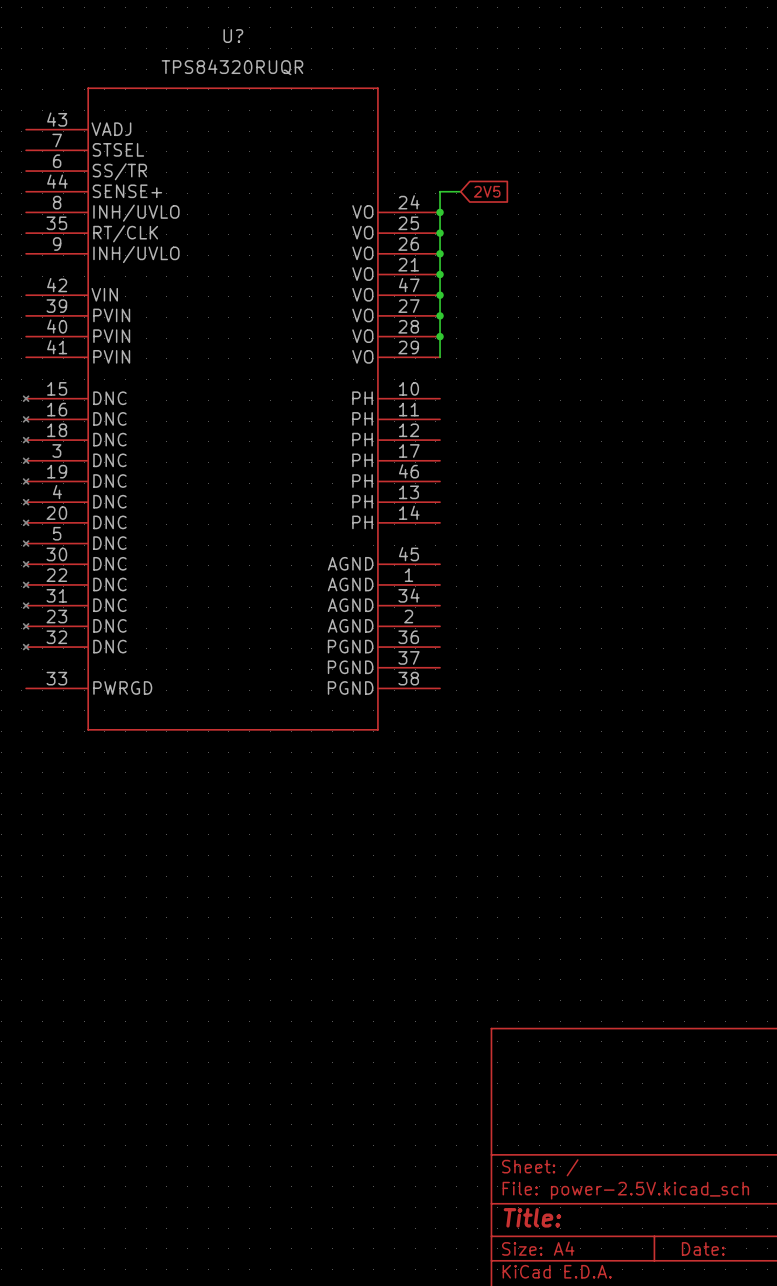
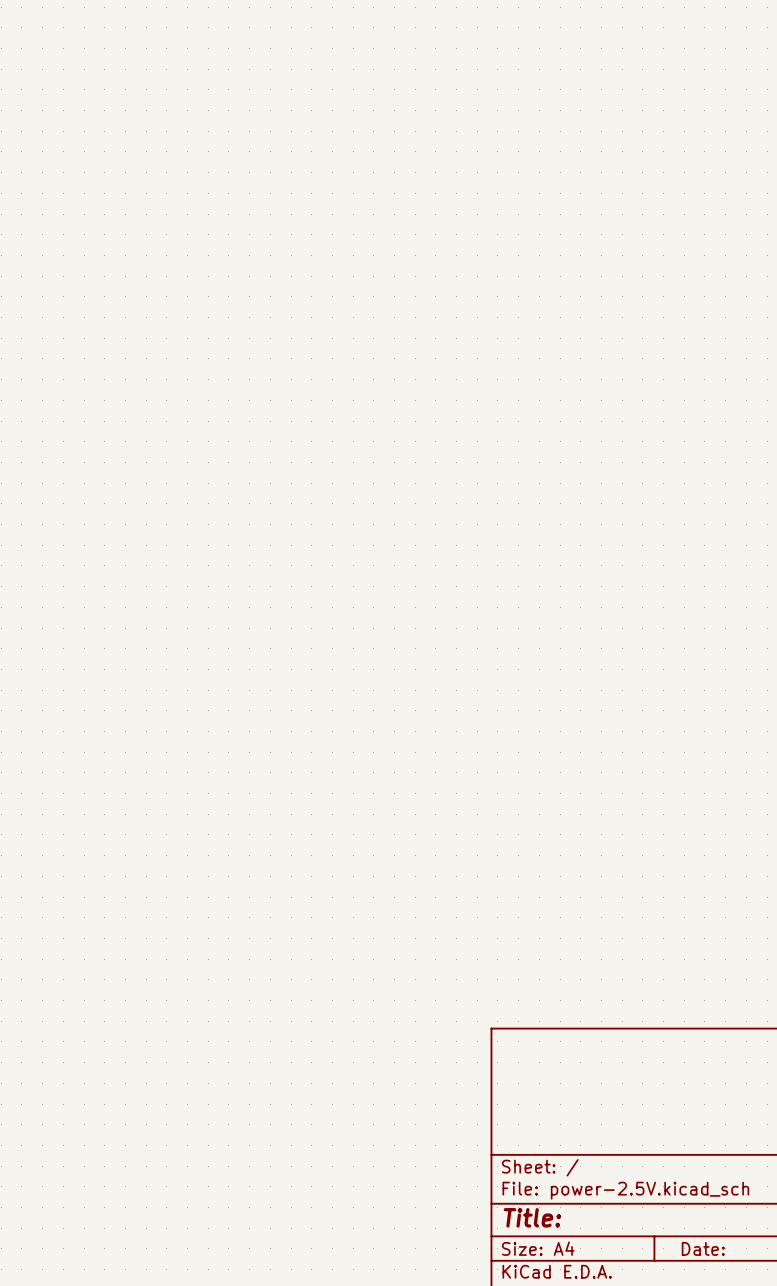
wire: (460, 191) (440, 191) (440, 357) -> none
global label: 2V5 (487, 191) -> none
junction: (440, 212) -> none
junction: (440, 233) -> none
junction: (440, 253) -> none
junction: (440, 274) -> none
junction: (440, 295) -> none
junction: (440, 315) -> none
junction: (440, 336) -> none
U?: TPS84320RUQR (231, 409) -> none

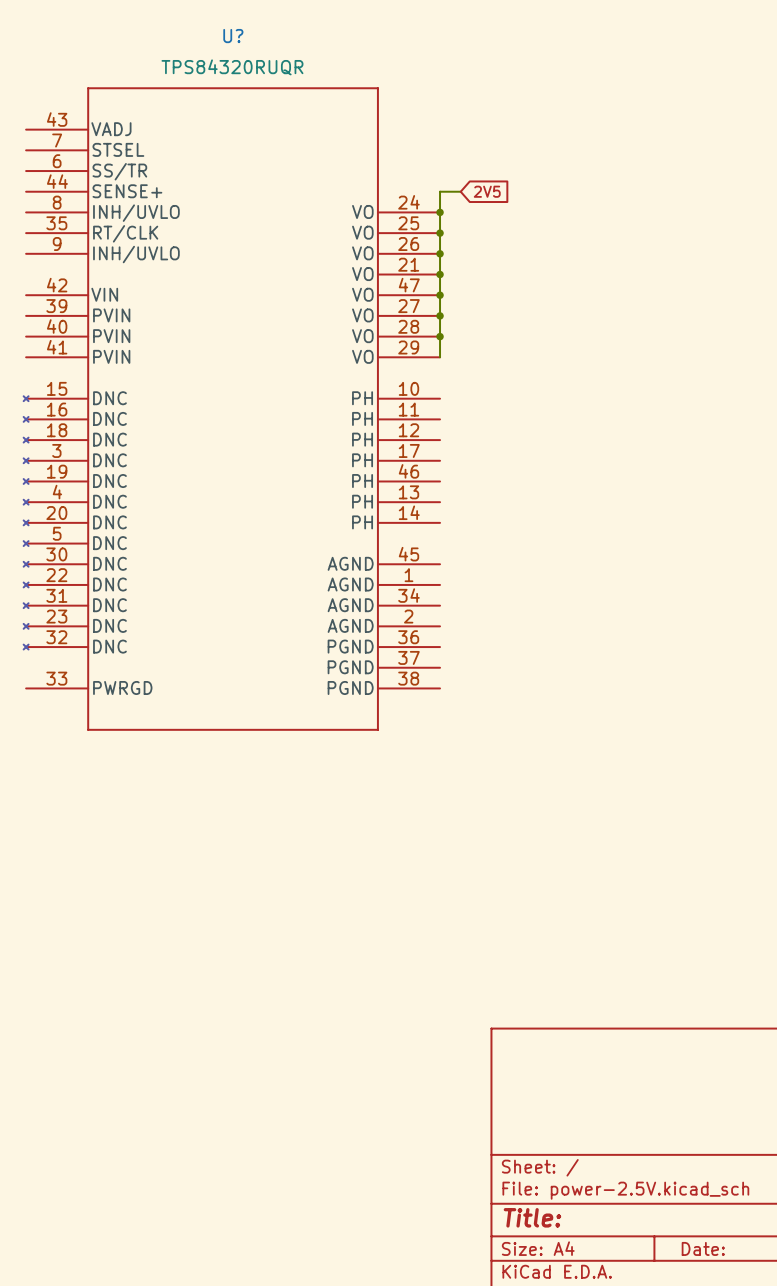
wire: none -> (460, 191) (440, 191) (440, 357)
global label: none -> 2V5 (487, 191)
junction: none -> (440, 212)
junction: none -> (440, 233)
junction: none -> (440, 253)
junction: none -> (440, 274)
junction: none -> (440, 295)
junction: none -> (440, 315)
junction: none -> (440, 336)
U?: none -> TPS84320RUQR (231, 409)

